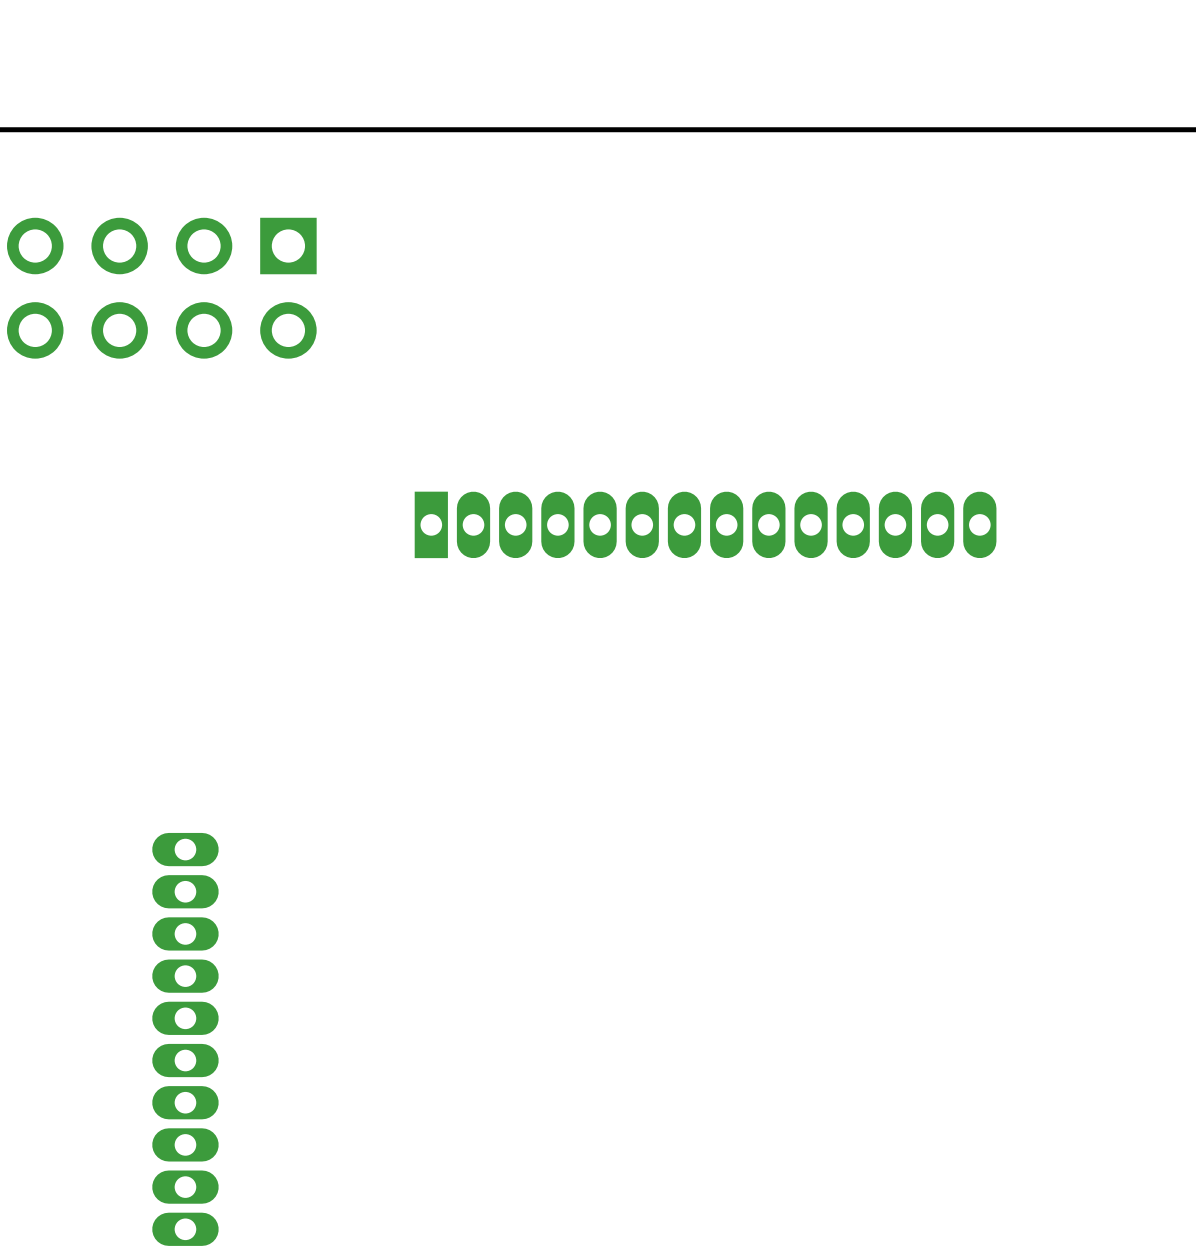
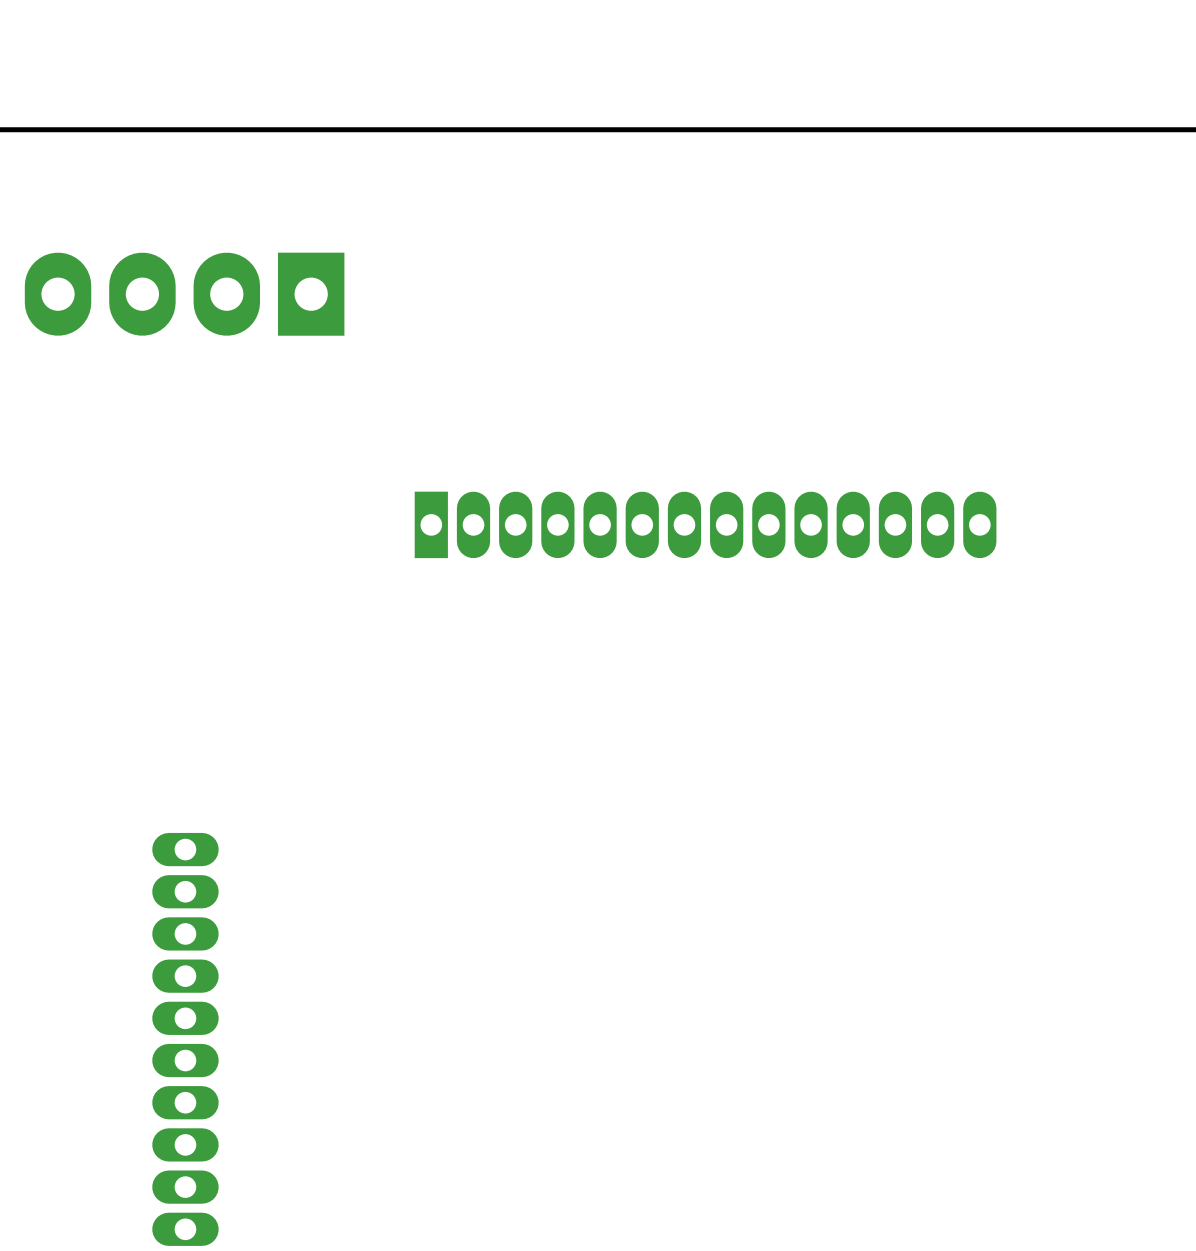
part footprint: [7, 217, 317, 359] -> [24, 252, 345, 336]

